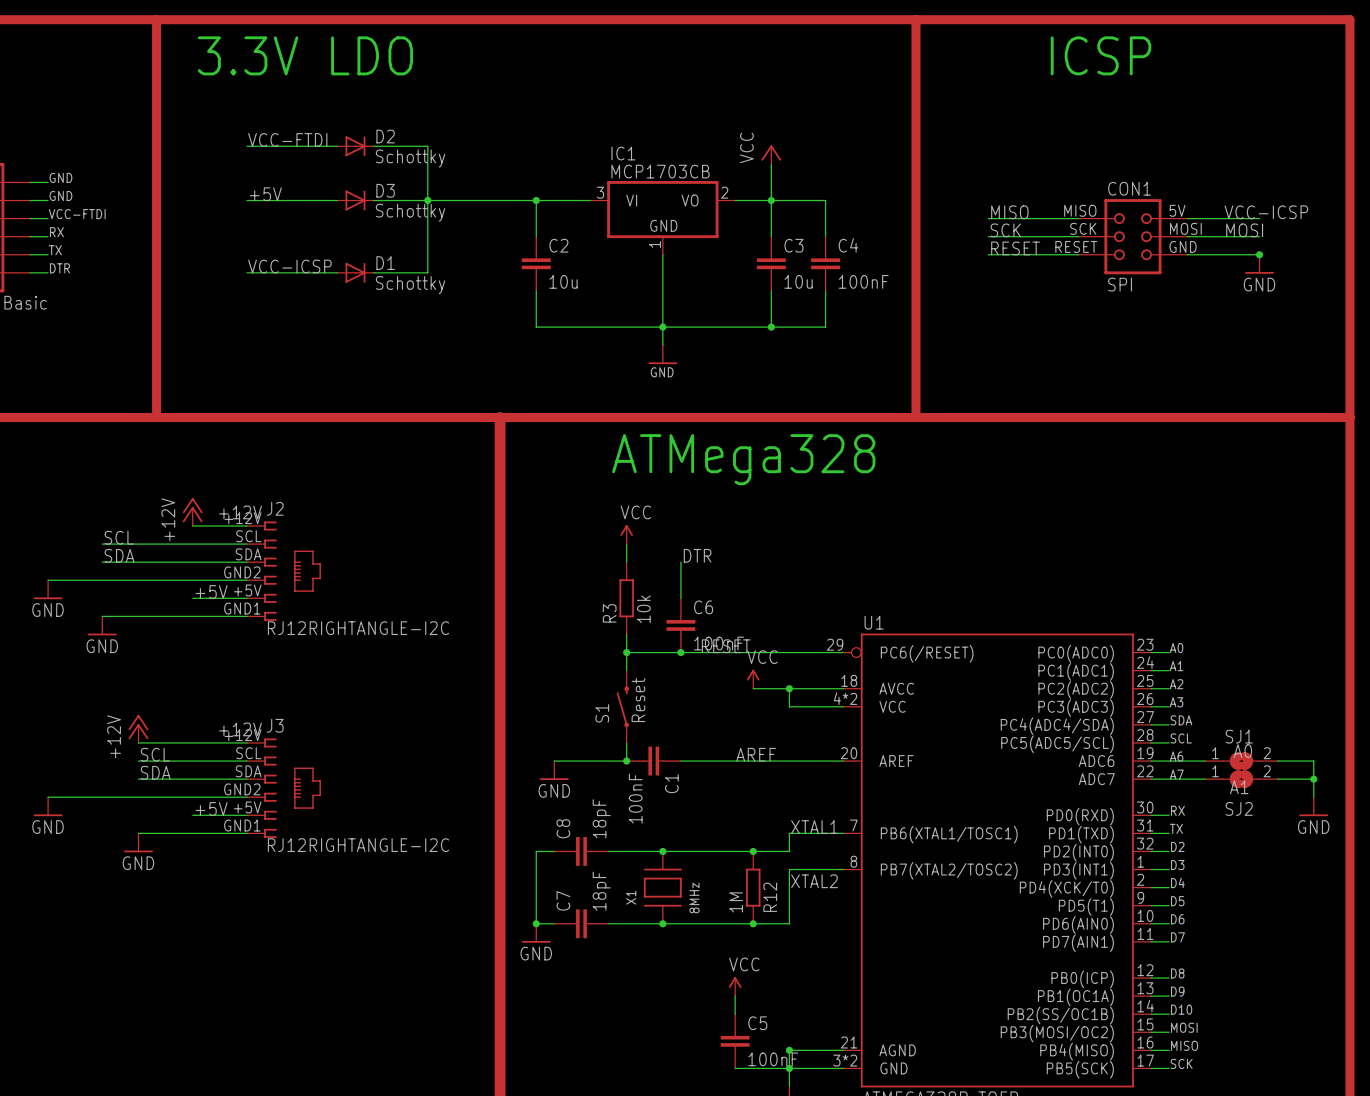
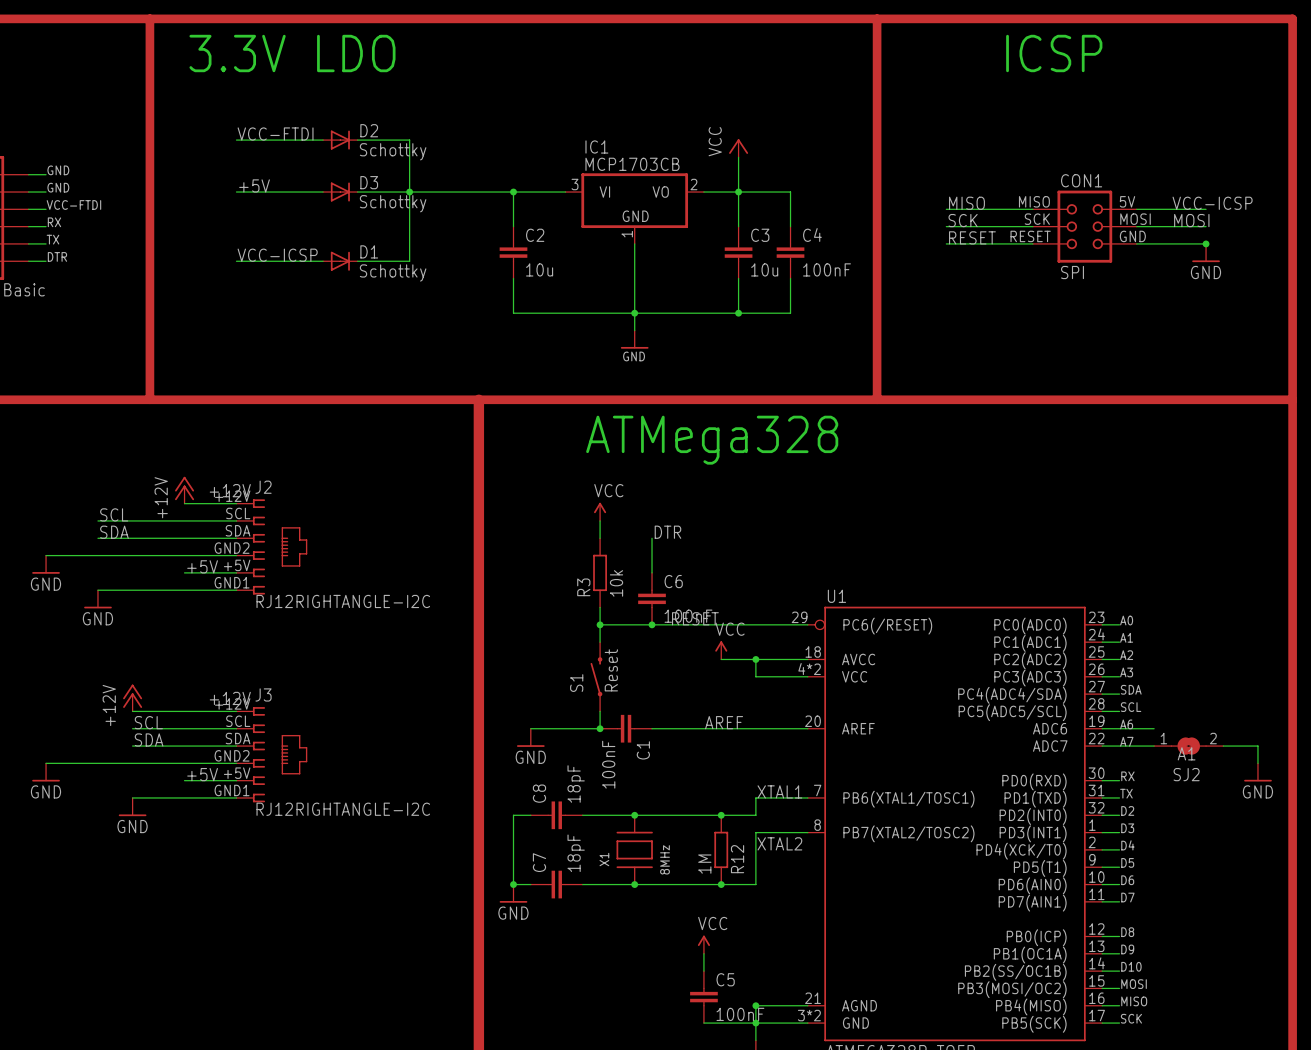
SJ1: A0 (1241, 761) -> none
wire: (1277, 761) (1313, 761) (1313, 779) -> none
junction: (1313, 779) -> none

